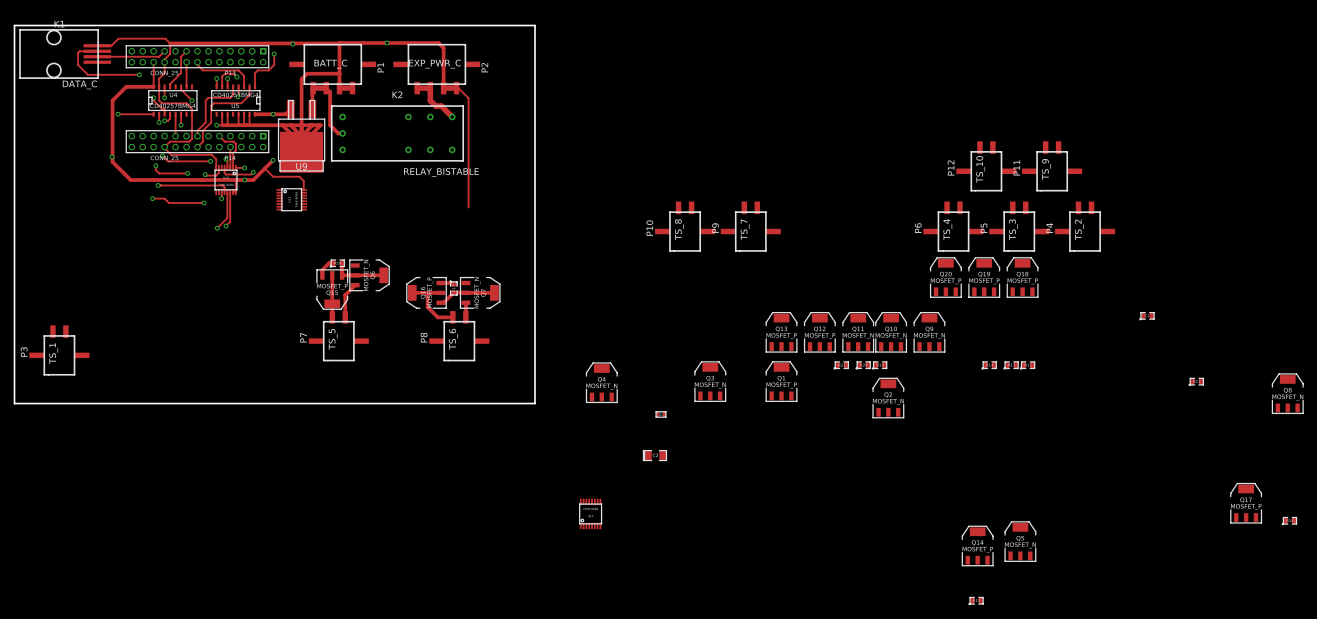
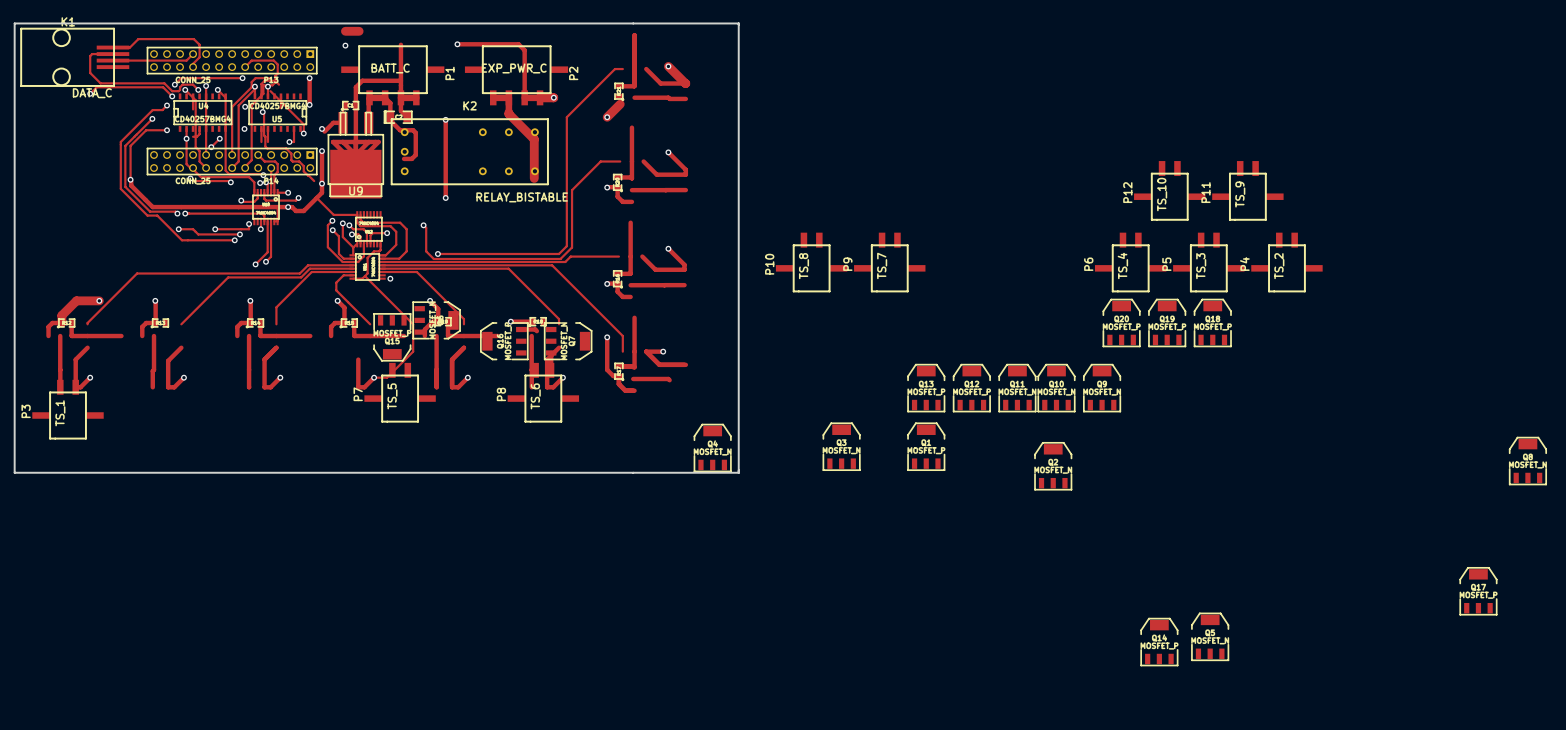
board edge: (534, 25) (534, 403) -> (633, 23) (738, 23) (738, 472) (633, 472)
track: none -> (345, 31) (359, 31)
track: none -> (634, 35) (634, 85) (618, 86)
track: (387, 43) (170, 43) -> none
track: (186, 51) (181, 56) (181, 73) (170, 84) (170, 86) -> none
track: (274, 54) (274, 64) (268, 70) (257, 70) (255, 73) (255, 86) -> none
via: (274, 54) -> none
track: none -> (668, 66) (685, 83) (660, 83) (646, 69)
via: none -> (668, 66)
track: (153, 62) (153, 79) -> (198, 89) (193, 84) (182, 84) (180, 87)
track: (164, 62) (164, 73) (159, 78) (159, 100) (161, 103) (186, 103) (192, 108) -> (217, 89) (225, 97) (225, 122)
track: (186, 62) (186, 86) -> none
track: (197, 62) (197, 64) (202, 70) (238, 70) (244, 75) (244, 86) -> none
track: none -> (245, 67) (251, 60) (273, 60) (277, 64) (275, 82) (272, 85) (263, 85) (263, 93) (251, 105) (251, 160) (245, 168)
track: none -> (622, 69) (615, 69) (566, 117) (566, 246) (559, 253) (437, 253)
track: (78, 64) (87, 74) (139, 74) -> (90, 70) (90, 72) (100, 83) (164, 83) (172, 91) (180, 89)
track: none -> (242, 78) (181, 78) (174, 84)
via: none -> (242, 78)
track: none -> (309, 78) (309, 104)
via: none -> (309, 78)
via: (139, 74) -> none
via: none -> (174, 84)
via: (236, 77) -> none
track: none -> (206, 85) (206, 128)
via: none -> (206, 85)
track: (153, 81) (153, 86) (126, 86) (112, 100) (112, 158) -> none
track: none -> (185, 89) (195, 100) (195, 147) (199, 151) (199, 161) (206, 168)
via: none -> (185, 89)
via: none -> (198, 89)
via: none -> (217, 89)
track: none -> (270, 91) (303, 124) (303, 133)
track: none -> (90, 93) (96, 87) (163, 87) (172, 96)
via: none -> (90, 93)
via: none -> (172, 96)
track: (181, 86) (181, 89) (192, 100) -> none
track: (233, 86) (233, 95) (230, 97) (208, 97) (205, 100) (205, 122) (197, 130) -> (269, 78) (255, 78) (251, 82) (251, 87) (232, 106) (232, 148)
track: (249, 86) (249, 95) (241, 103) (213, 103) (211, 106) (211, 122) (202, 130) -> (256, 87) (238, 105) (238, 148)
via: none -> (553, 97)
track: none -> (634, 97) (685, 98)
track: none -> (400, 97) (400, 110) (407, 117)
track: (458, 88) (468, 98) (468, 207) -> (542, 97) (553, 97)
track: (330, 91) (330, 125) (338, 133) (342, 133) -> (389, 102) (390, 120) (400, 130) (413, 130) (415, 132) (415, 155) (411, 158) (404, 158)
via: none -> (309, 104)
track: none -> (620, 104) (607, 117)
track: none -> (167, 105) (162, 110) (152, 110) (120, 141) (120, 188) (147, 215) (157, 215) (182, 240) (234, 240)
via: none -> (167, 105)
track: none -> (345, 105) (343, 108) (343, 122) (333, 122) (324, 131)
via: none -> (245, 106)
via: (238, 96) -> none
track: (153, 97) (153, 100) (161, 108) (164, 108) (164, 114) -> none
via: (153, 97) -> none
via: (164, 97) -> none
via: (192, 100) -> none
track: none -> (262, 112) (265, 146) (267, 148) (286, 148) (291, 153) (291, 160) (299, 161) (303, 166) (303, 171) (314, 181)
via: none -> (262, 112)
track: (430, 100) (435, 106) (441, 106) (452, 117) -> (508, 112) (534, 139) (534, 178)
via: none -> (607, 117)
track: none -> (152, 118) (125, 145) (125, 186) (150, 211) (175, 211) (177, 213)
via: none -> (152, 118)
track: none -> (445, 119) (445, 197)
via: none -> (445, 119)
track: (290, 109) (285, 114) (255, 114) -> none
track: none -> (631, 127) (631, 178) (617, 177)
track: (118, 114) (153, 114) -> none
via: (118, 114) -> none
track: (181, 114) (181, 125) -> none
via: none -> (244, 128)
track: (238, 114) (238, 125) -> none
track: (244, 114) (244, 125) -> none
track: none -> (167, 130) (146, 130) (130, 145) (130, 179)
via: none -> (167, 130)
via: none -> (303, 133)
via: (164, 120) -> none
track: none -> (219, 138) (211, 147)
via: none -> (219, 138)
via: (181, 125) -> none
track: (216, 125) (282, 125) -> none
via: (216, 125) -> none
via: none -> (289, 141)
via: none -> (211, 147)
via: none -> (322, 151)
track: none -> (668, 152) (685, 169) (685, 174) (656, 174) (643, 161)
via: none -> (668, 152)
track: (192, 138) (189, 141) (170, 141) (164, 147) -> (186, 141) (186, 164) (193, 168)
track: none -> (225, 158) (225, 170) (229, 174) (263, 175)
track: none -> (620, 161) (600, 161) (572, 190) (572, 247) (560, 258) (433, 258) (426, 251) (426, 227) (423, 225)
via: none -> (263, 175)
track: (164, 158) (167, 161) (210, 161) -> (193, 181) (230, 182)
via: none -> (230, 182)
via: none -> (260, 183)
track: (273, 160) (253, 180) (247, 180) -> (322, 151) (322, 192) (303, 211) (295, 211) (292, 207)
via: (210, 161) -> none
track: none -> (607, 187) (617, 187) (617, 196) (622, 201) (631, 201)
via: none -> (607, 187)
track: (155, 165) (155, 170) (159, 173) (187, 173) -> none
via: (155, 165) -> none
track: none -> (685, 190) (631, 190)
track: (264, 168) (268, 172) -> none
via: none -> (445, 197)
via: (187, 173) -> none
track: (273, 176) (299, 176) (303, 181) (303, 189) -> (322, 203) (333, 214) (357, 214) (357, 222) (360, 226) (390, 226) (396, 231) (396, 244) (385, 255) (381, 255)
via: none -> (177, 213)
track: none -> (360, 214) (360, 219) (363, 222) (400, 222) (406, 229) (406, 251) (399, 258) (381, 258)
track: none -> (332, 220) (327, 225) (327, 247) (342, 262) (358, 262) (363, 256) (363, 243)
via: none -> (332, 220)
track: none -> (342, 223) (342, 237) (353, 247) (353, 255)
via: none -> (342, 223)
track: none -> (630, 222) (630, 273) (617, 273)
track: none -> (249, 224) (249, 229) (215, 229)
via: none -> (249, 224)
track: none -> (349, 225) (353, 229) (363, 229) (366, 232) (367, 243)
via: none -> (349, 225)
via: none -> (423, 225)
via: none -> (215, 229)
track: none -> (332, 230) (338, 236) (338, 253) (343, 258) (353, 258)
via: none -> (332, 230)
part position: (291, 199) -> (367, 267)
track: none -> (387, 233) (372, 233) (370, 235) (370, 243)
via: none -> (387, 233)
track: none -> (351, 234) (358, 234) (360, 236) (360, 243)
via: none -> (351, 234)
via: none -> (234, 240)
track: none -> (357, 243) (353, 247)
track: none -> (380, 243) (380, 250) (374, 251) (367, 257) (367, 273) (362, 278) (353, 278)
track: none -> (668, 248) (684, 264) (684, 269) (655, 269) (642, 256)
via: none -> (668, 248)
via: none -> (437, 253)
track: none -> (618, 256) (570, 256) (565, 262) (381, 262)
track: none -> (353, 265) (308, 265) (299, 273) (137, 273) (87, 324)
track: none -> (381, 265) (552, 265) (622, 336) (622, 351)
track: none -> (353, 268) (309, 268) (301, 277) (228, 277) (181, 324)
track: none -> (381, 268) (508, 268) (559, 319) (559, 324)
track: none -> (353, 272) (311, 272) (276, 307) (276, 324)
track: none -> (381, 272) (416, 272) (463, 319) (463, 324)
track: none -> (353, 275) (343, 275) (336, 282) (336, 290) (370, 324)
track: none -> (364, 276) (413, 324) (413, 351) (387, 377) (374, 377) (364, 387) (358, 387) (358, 359)
via: none -> (390, 278)
track: none -> (607, 283) (617, 283) (617, 291) (622, 296) (630, 296)
via: none -> (607, 283)
track: none -> (684, 285) (630, 285)
track: none -> (99, 300) (76, 300) (61, 315) (61, 323) (52, 323) (48, 326) (48, 336)
via: none -> (99, 300)
track: none -> (155, 300) (155, 323) (146, 323) (142, 326) (142, 336)
via: none -> (155, 300)
track: none -> (250, 300) (250, 323) (241, 323) (237, 326) (237, 336)
via: none -> (250, 300)
track: none -> (337, 300) (344, 307) (344, 323) (335, 323) (331, 326) (331, 336)
via: none -> (337, 300)
track: none -> (430, 300) (438, 309) (438, 321) (432, 321) (424, 329) (424, 336)
via: none -> (430, 300)
track: (333, 263) (328, 263) (322, 269) (322, 275) -> none
part rotation: 0° (337, 263) -> 90° counterclockwise (617, 279)
part position: (337, 263) -> (617, 279)
track: (341, 263) (342, 275) (383, 275) -> (448, 321) (448, 336) (497, 336)
track: none -> (634, 317) (634, 367) (618, 366)
track: (332, 275) (332, 317) -> none
track: none -> (510, 321) (533, 321)
via: none -> (510, 321)
track: none -> (71, 323) (71, 336) (121, 336)
track: none -> (260, 323) (260, 336) (310, 336)
track: none -> (354, 323) (354, 336) (404, 336)
track: (355, 285) (345, 295) (345, 317) -> none
part rotation: 0° (453, 287) -> 180° (619, 371)
part position: (453, 287) -> (619, 371)
track: none -> (60, 336) (60, 387)
track: none -> (154, 336) (152, 387)
track: none -> (249, 336) (249, 387)
track: none -> (436, 336) (436, 387)
track: none -> (531, 336) (531, 387)
track: none -> (607, 337) (607, 369) (613, 376) (618, 376) (618, 384) (625, 390) (634, 390)
via: none -> (607, 337)
track: (412, 292) (440, 292) -> none
track: (427, 292) (427, 307) (437, 317) (452, 317) -> none
track: (494, 292) (453, 292) (443, 302) (440, 302) -> none
track: none -> (87, 347) (75, 359) (75, 387) (80, 387) (90, 377)
track: none -> (181, 347) (168, 360) (168, 387) (174, 387) (183, 377)
track: none -> (276, 347) (264, 359) (264, 387) (270, 387) (280, 377)
track: none -> (463, 347) (452, 359) (452, 387) (458, 387) (467, 377)
track: none -> (559, 347) (547, 359) (547, 387) (553, 387) (562, 377)
track: none -> (663, 351) (646, 351) (659, 364) (685, 364)
via: none -> (663, 351)
part position: (1146, 316) -> (350, 105)
via: none -> (90, 377)
via: none -> (183, 377)
via: none -> (280, 377)
via: none -> (374, 377)
via: none -> (467, 377)
via: none -> (562, 377)
track: none -> (633, 378) (669, 380)
part rotation: 0° (841, 365) -> 90° counterclockwise (619, 91)
part position: (841, 365) -> (619, 91)
part rotation: 0° (863, 365) -> 90° counterclockwise (617, 183)
part position: (863, 365) -> (617, 183)
part position: (879, 365) -> (442, 322)
part position: (989, 365) -> (254, 323)
part position: (1011, 365) -> (159, 323)
part position: (1027, 365) -> (66, 323)
part: (1196, 381) -> none
part: (661, 414) -> none
part position: (654, 455) -> (398, 117)
part position: (590, 513) -> (368, 229)
part position: (1289, 521) -> (537, 322)
part position: (976, 601) -> (348, 323)

